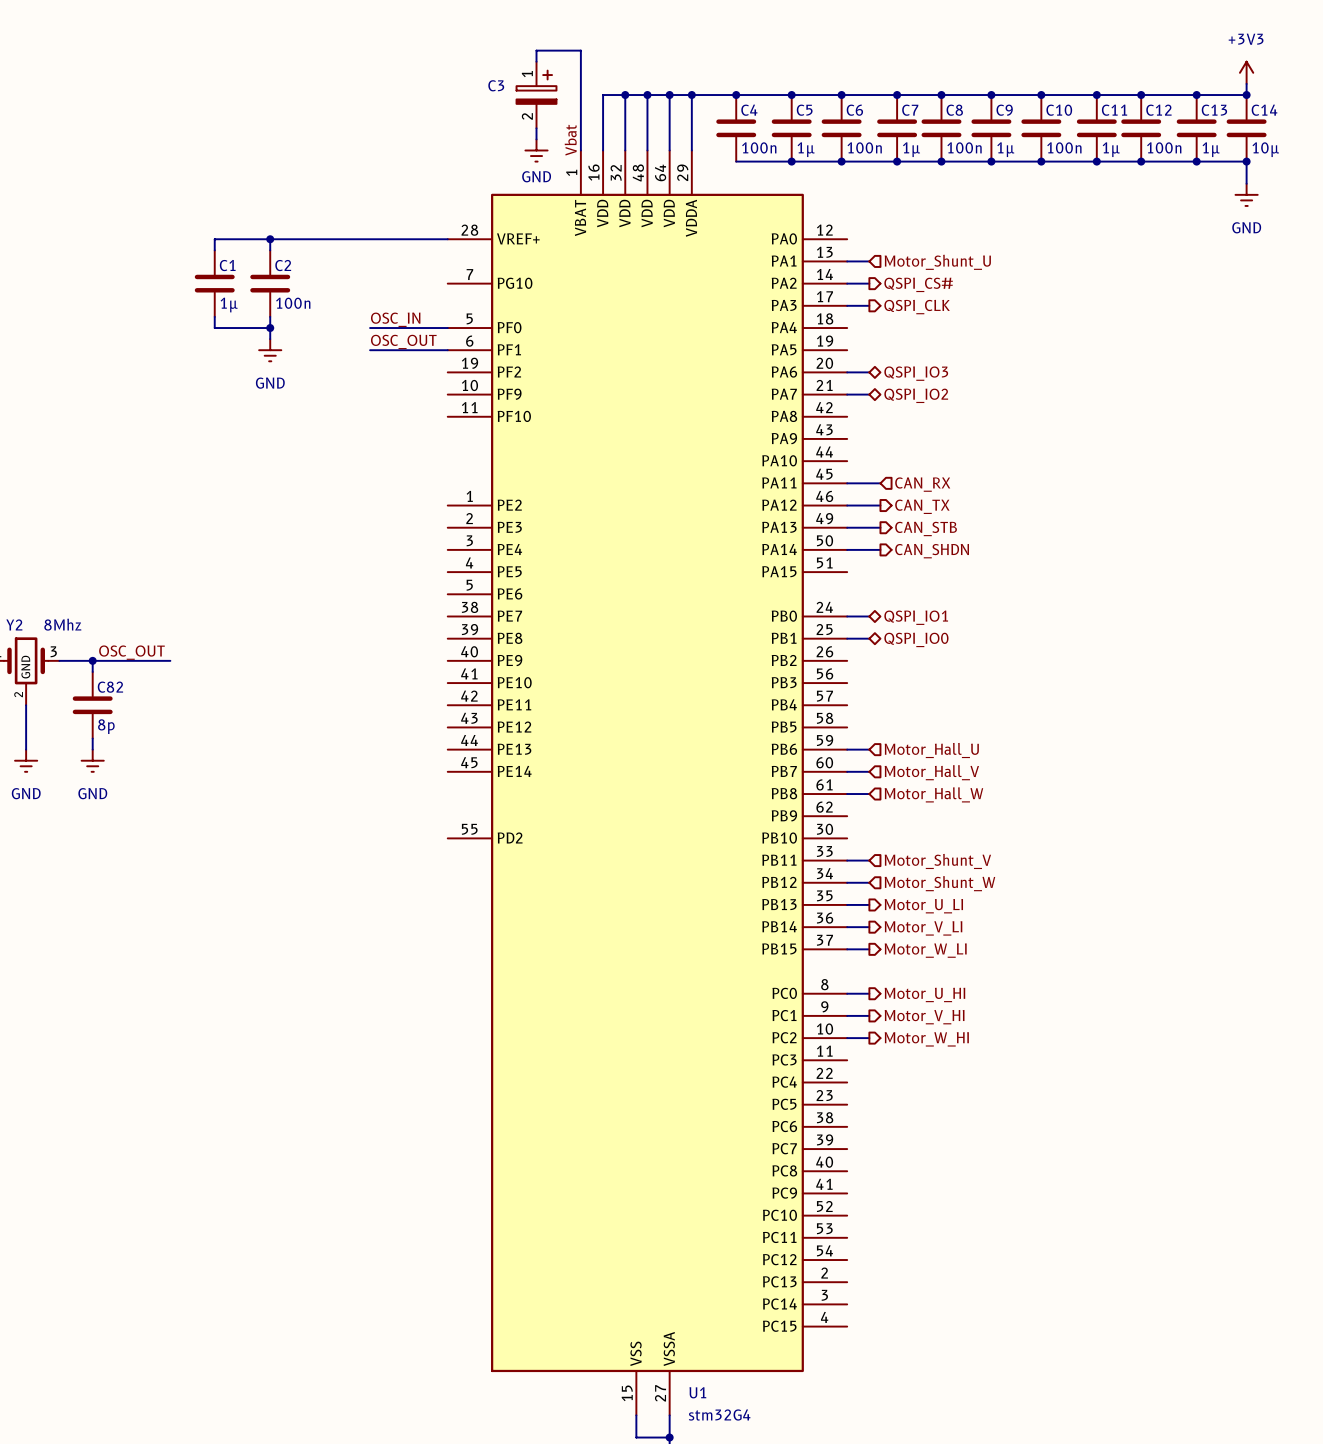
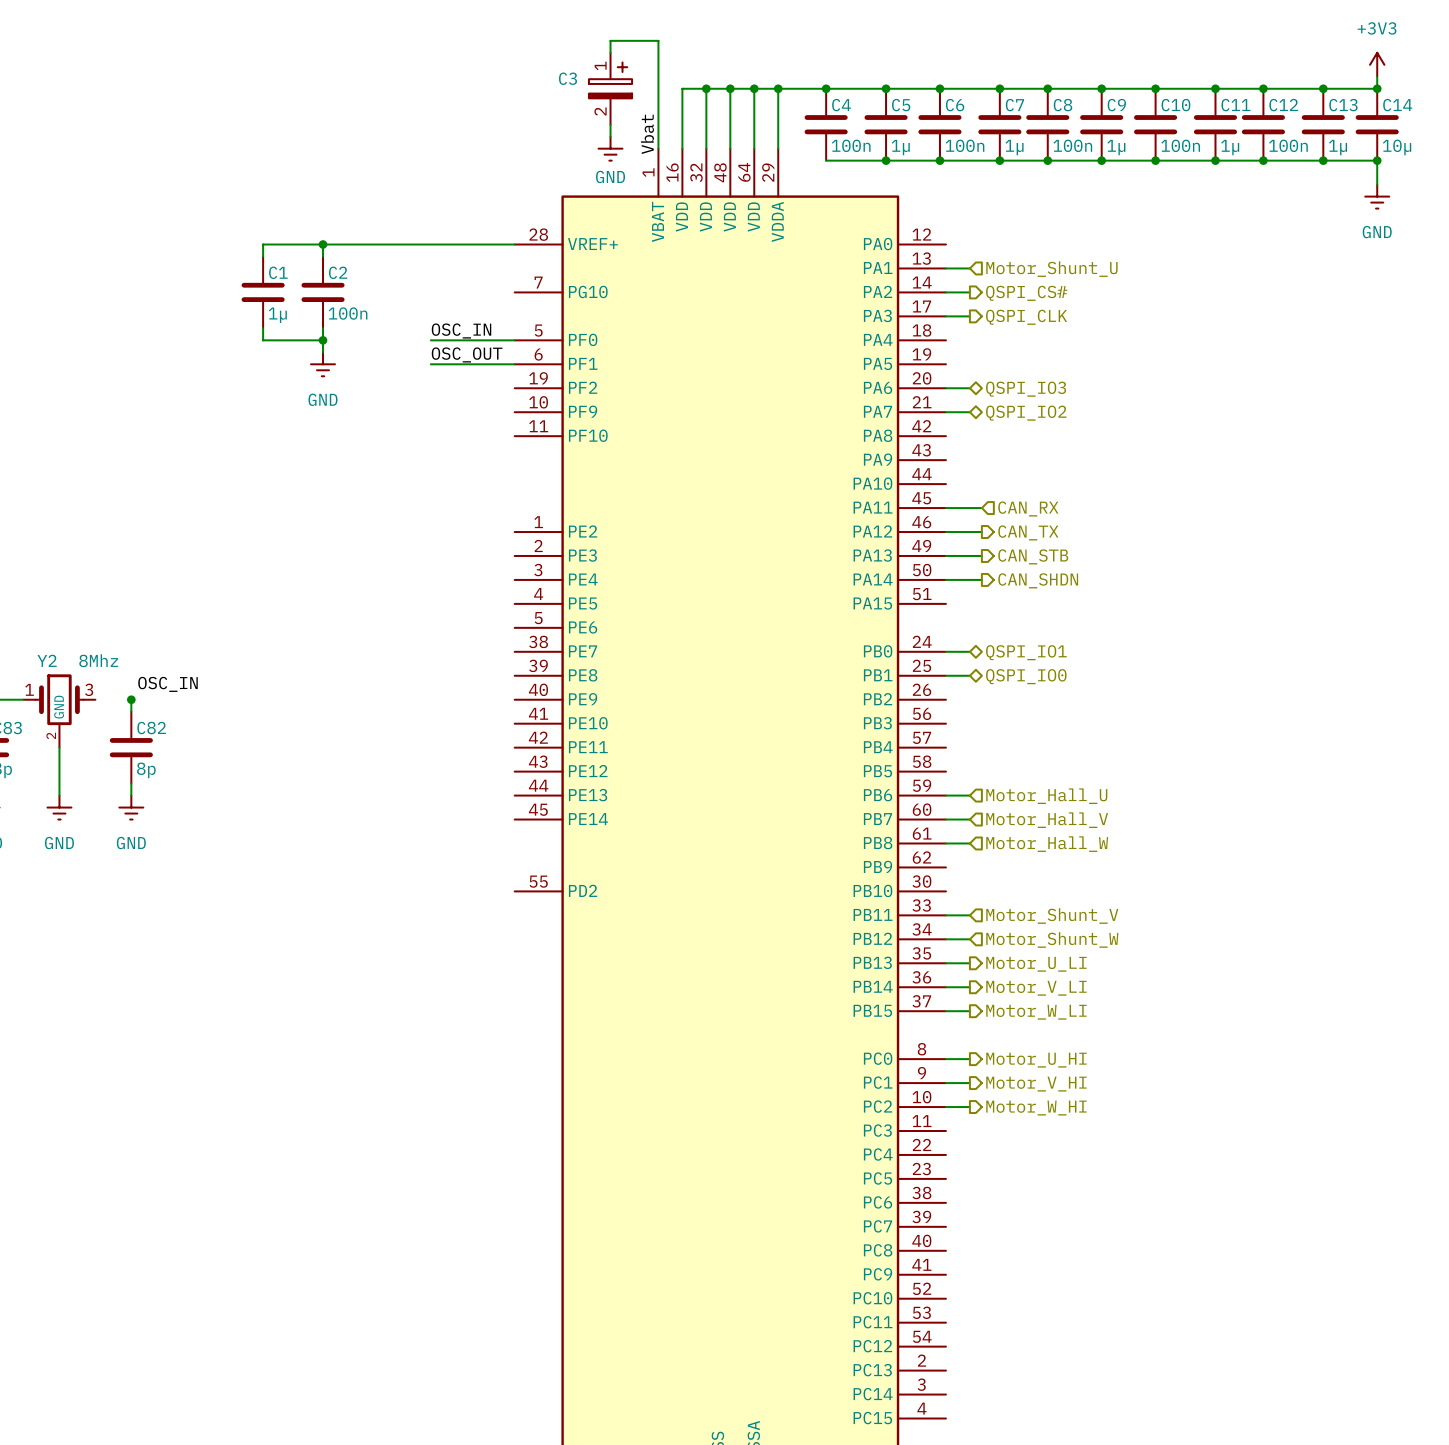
label: OSC_OUT (131, 652) -> OSC_IN (168, 684)
wire: (59, 660) (170, 660) -> none

